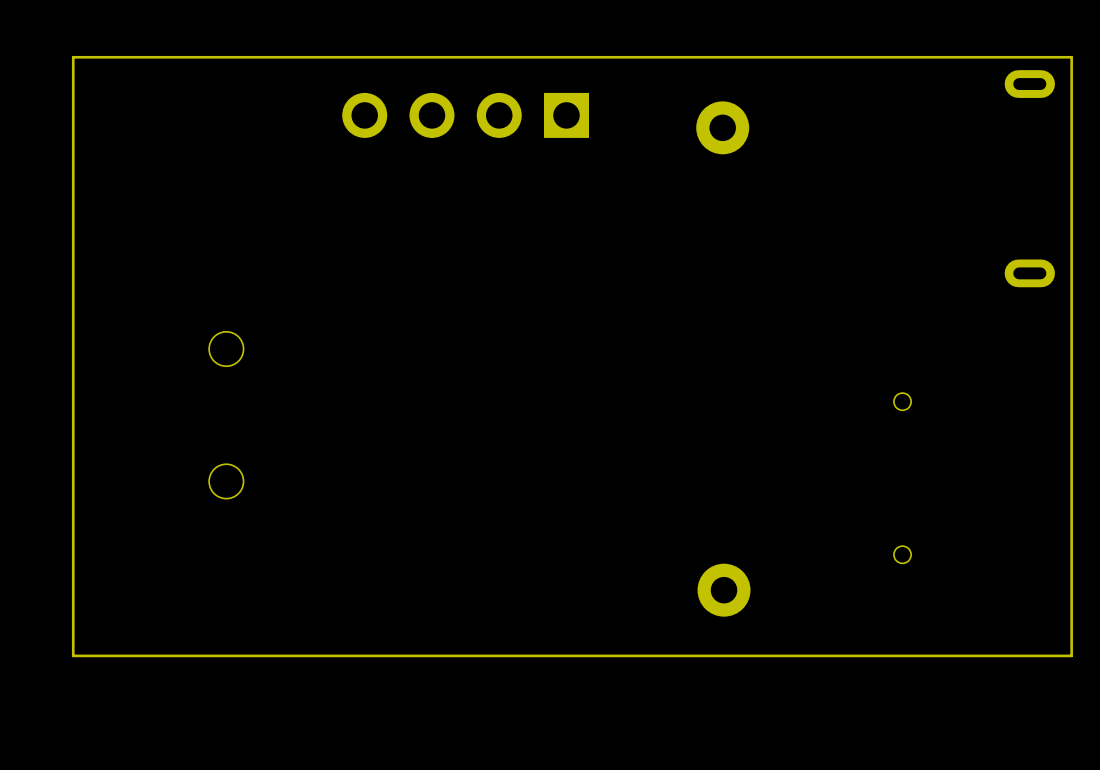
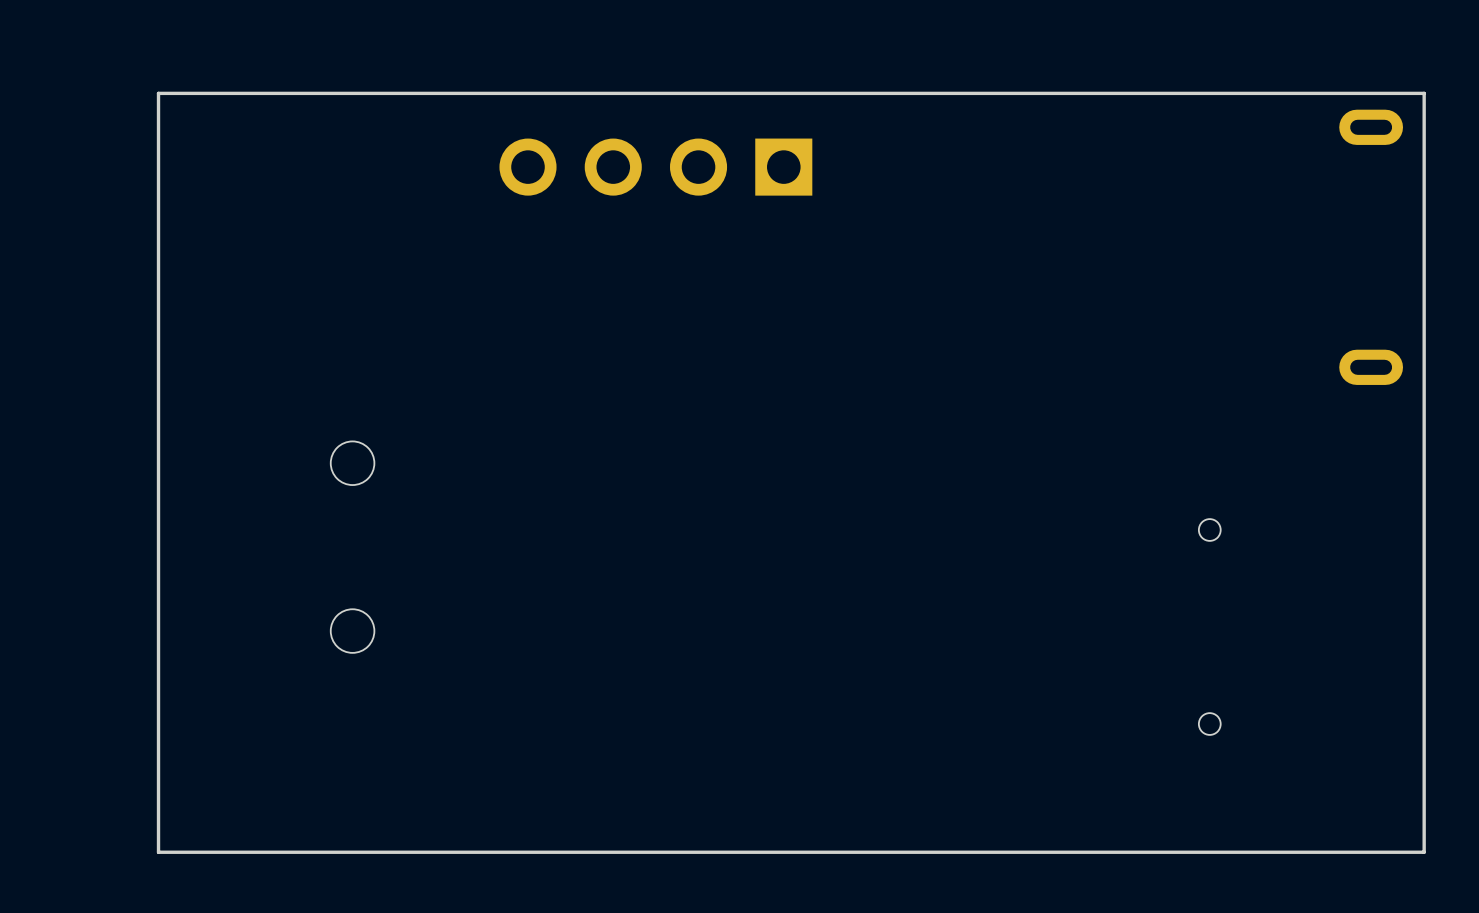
part: (722, 127) -> none
part: (724, 590) -> none

